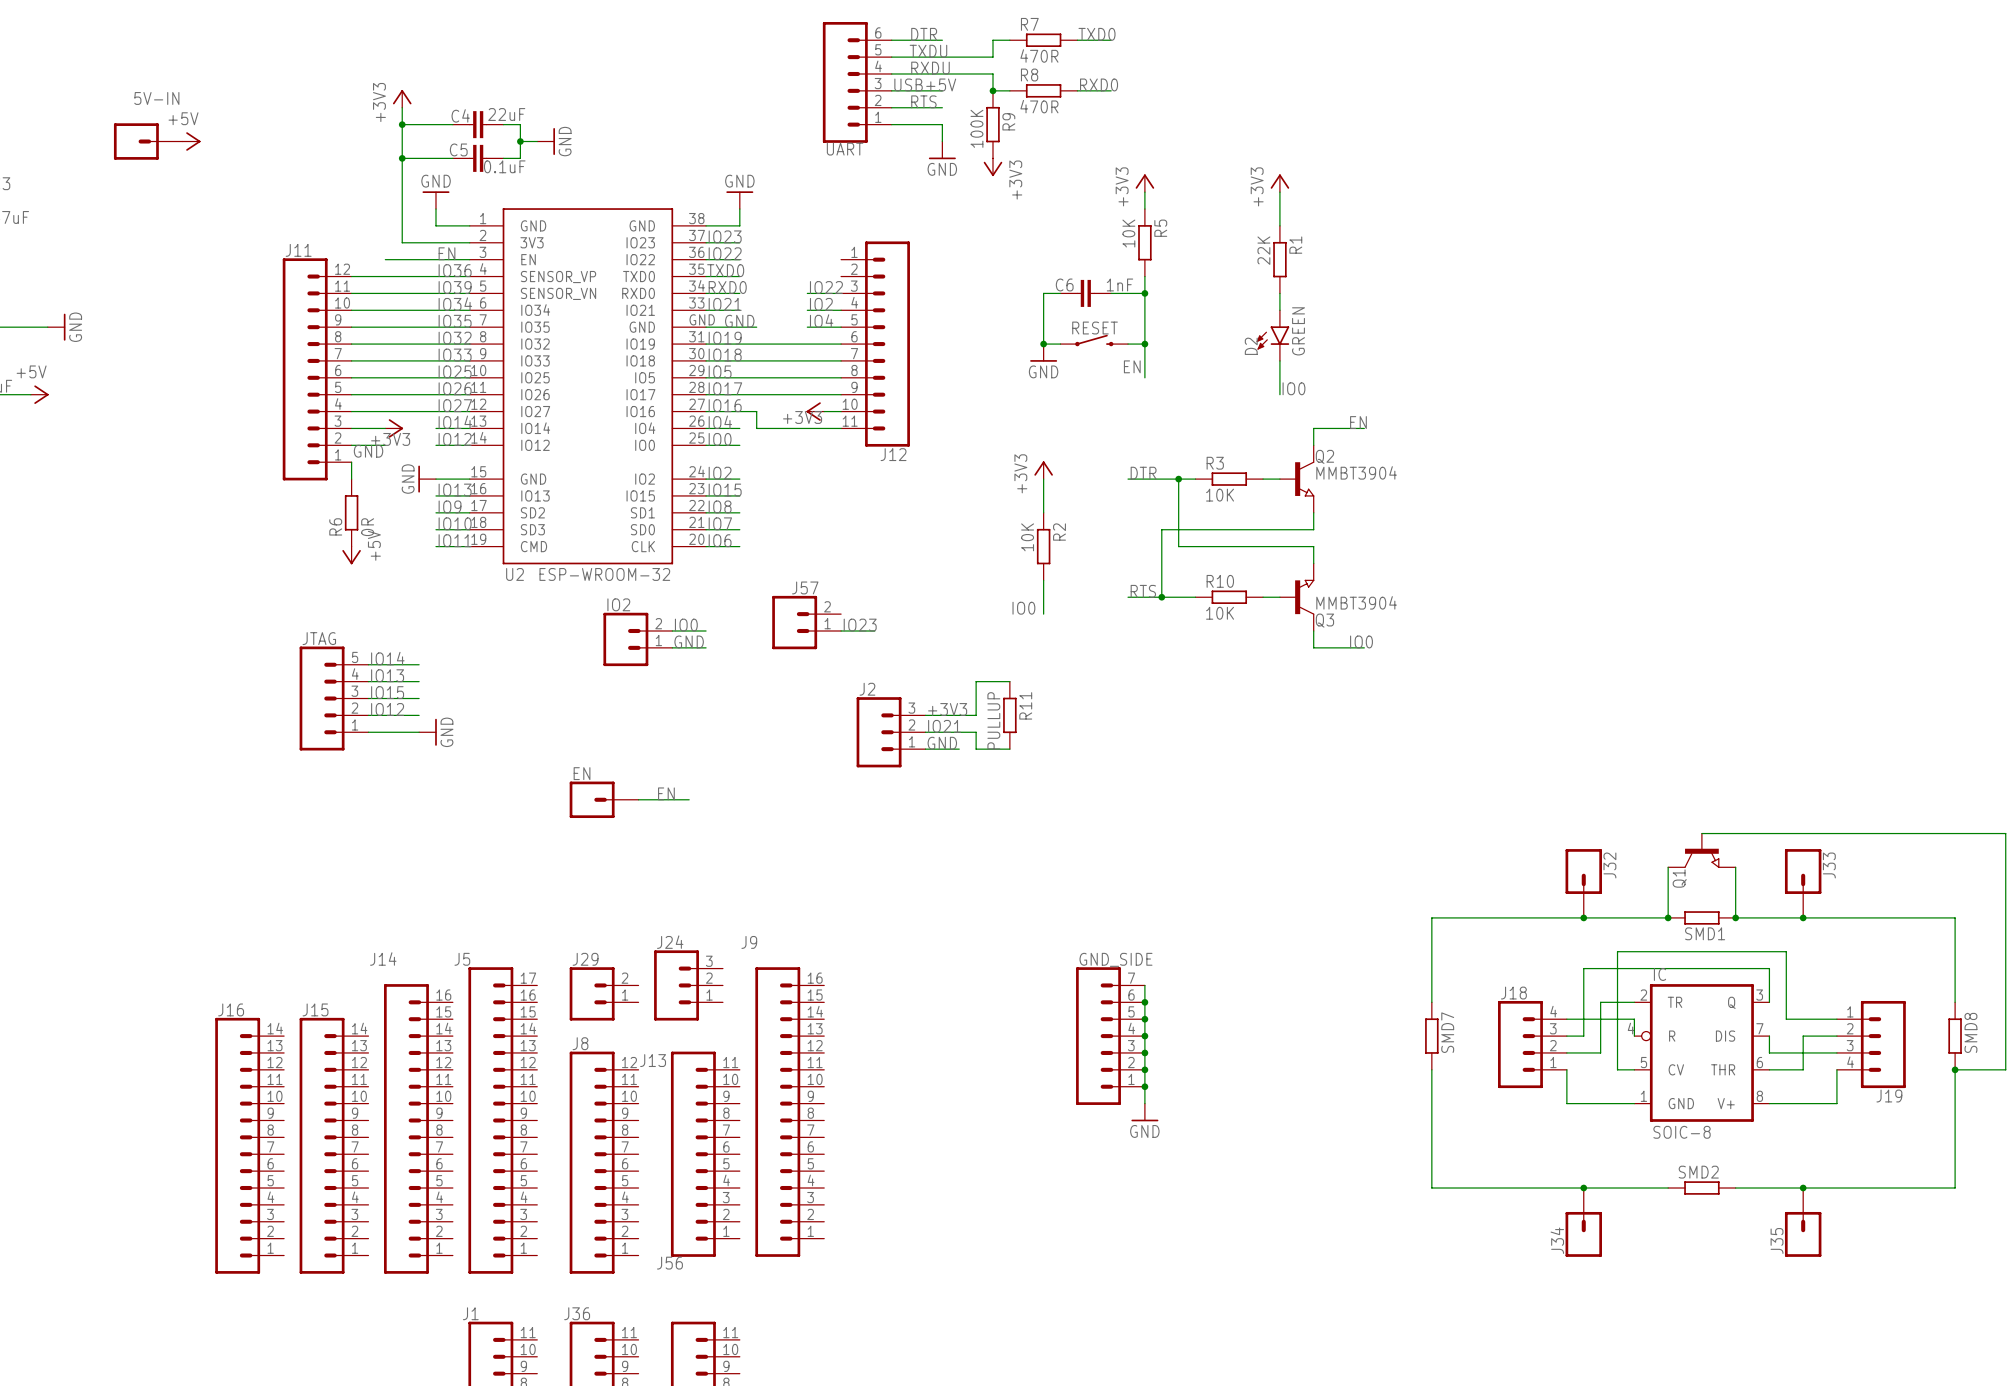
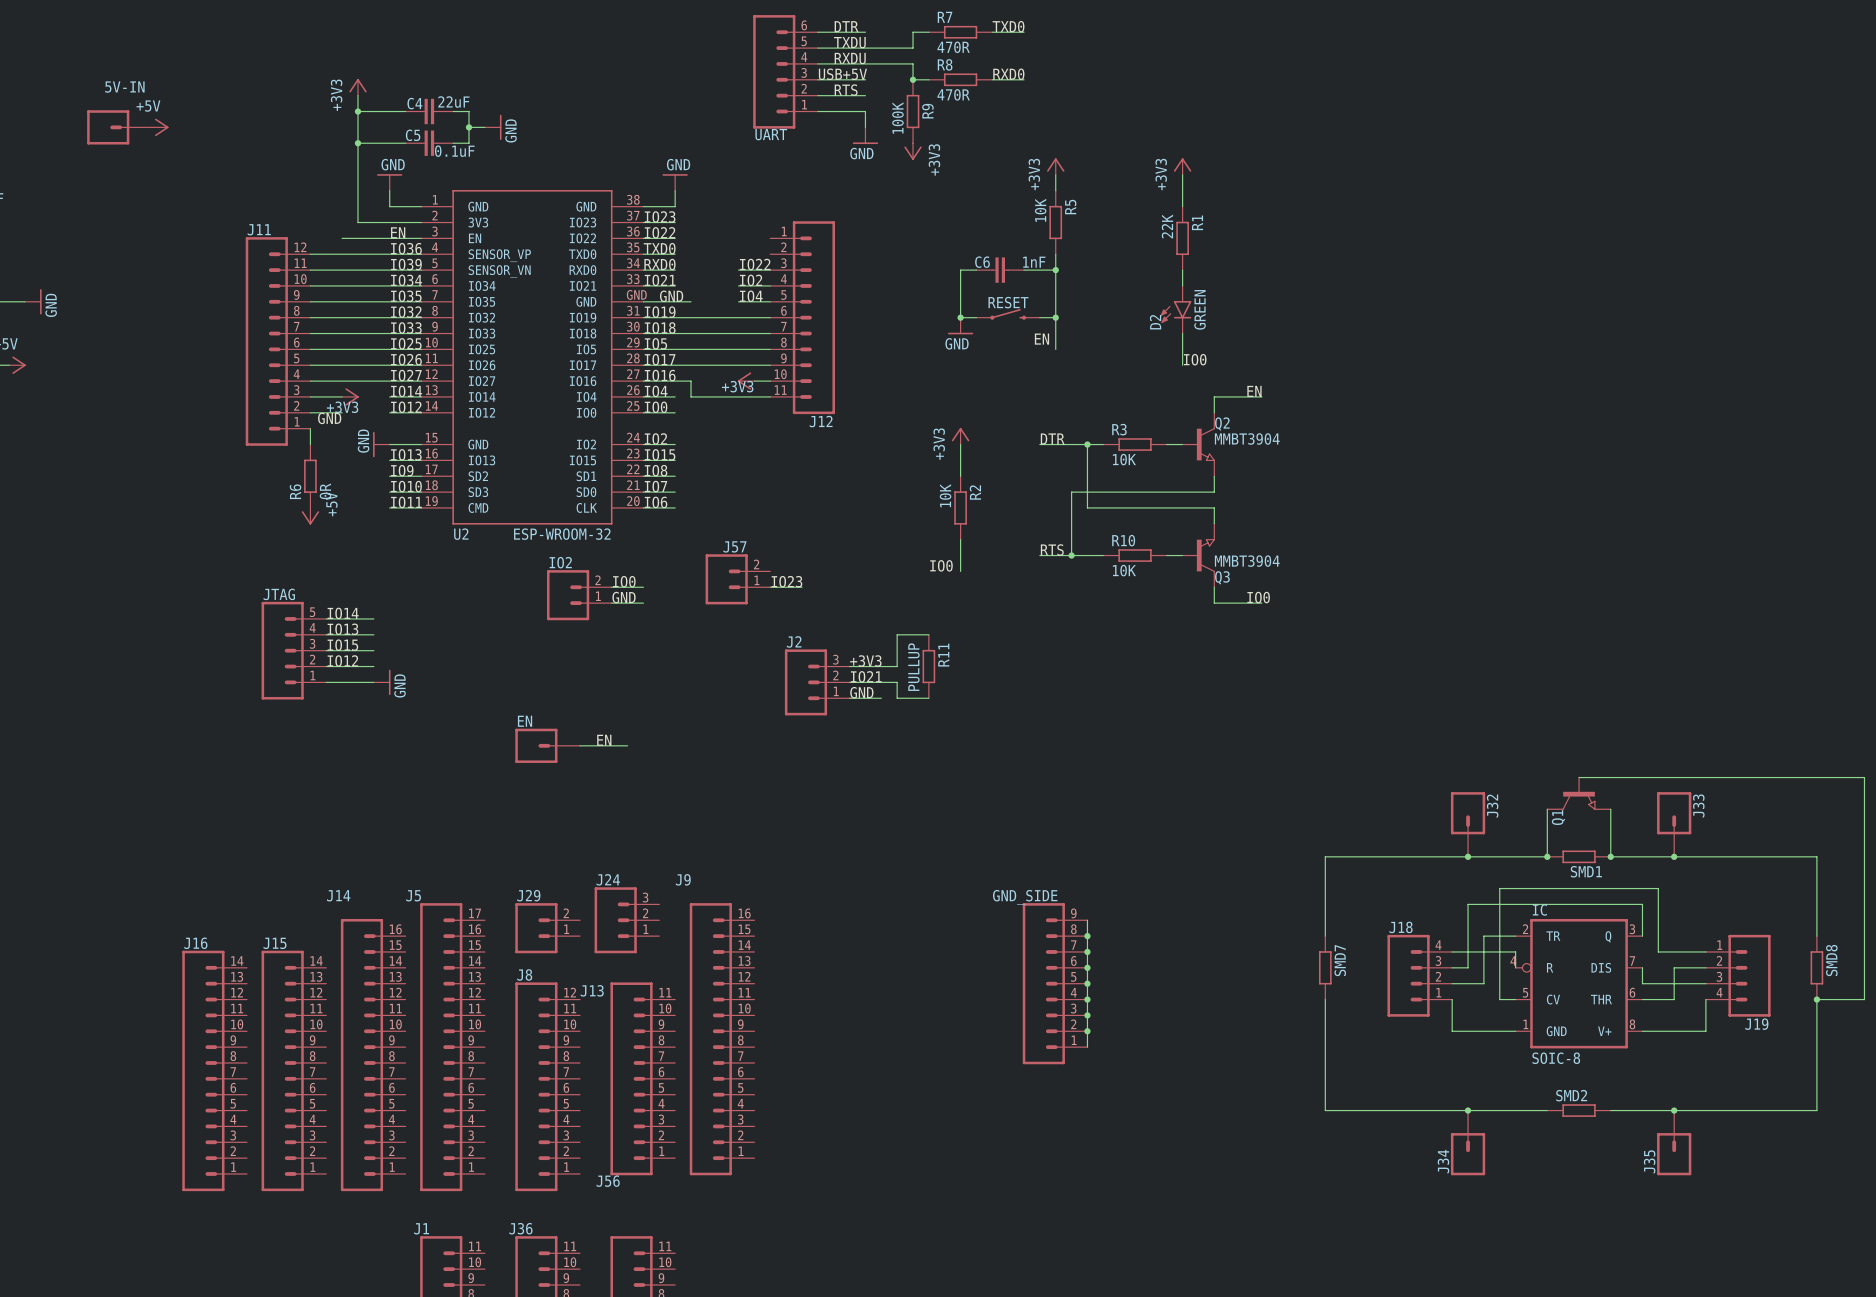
wire: (1144, 985) (1144, 1103) -> none
wire: none -> (1087, 920) (1087, 1047)
junction: (1144, 1002) -> none
junction: none -> (1087, 936)
junction: (1144, 1019) -> none
junction: none -> (1087, 951)
GND_SIDE: (1110, 1036) -> none
junction: (1144, 1036) -> none
junction: none -> (1087, 967)
GND_SIDE: none -> (1055, 983)
junction: (1144, 1052) -> none
junction: none -> (1087, 983)
junction: (1144, 1069) -> none
junction: none -> (1087, 999)
junction: (1144, 1086) -> none
junction: none -> (1087, 1015)
junction: none -> (1087, 1031)
power symbol: GND (1144, 1112) -> none

